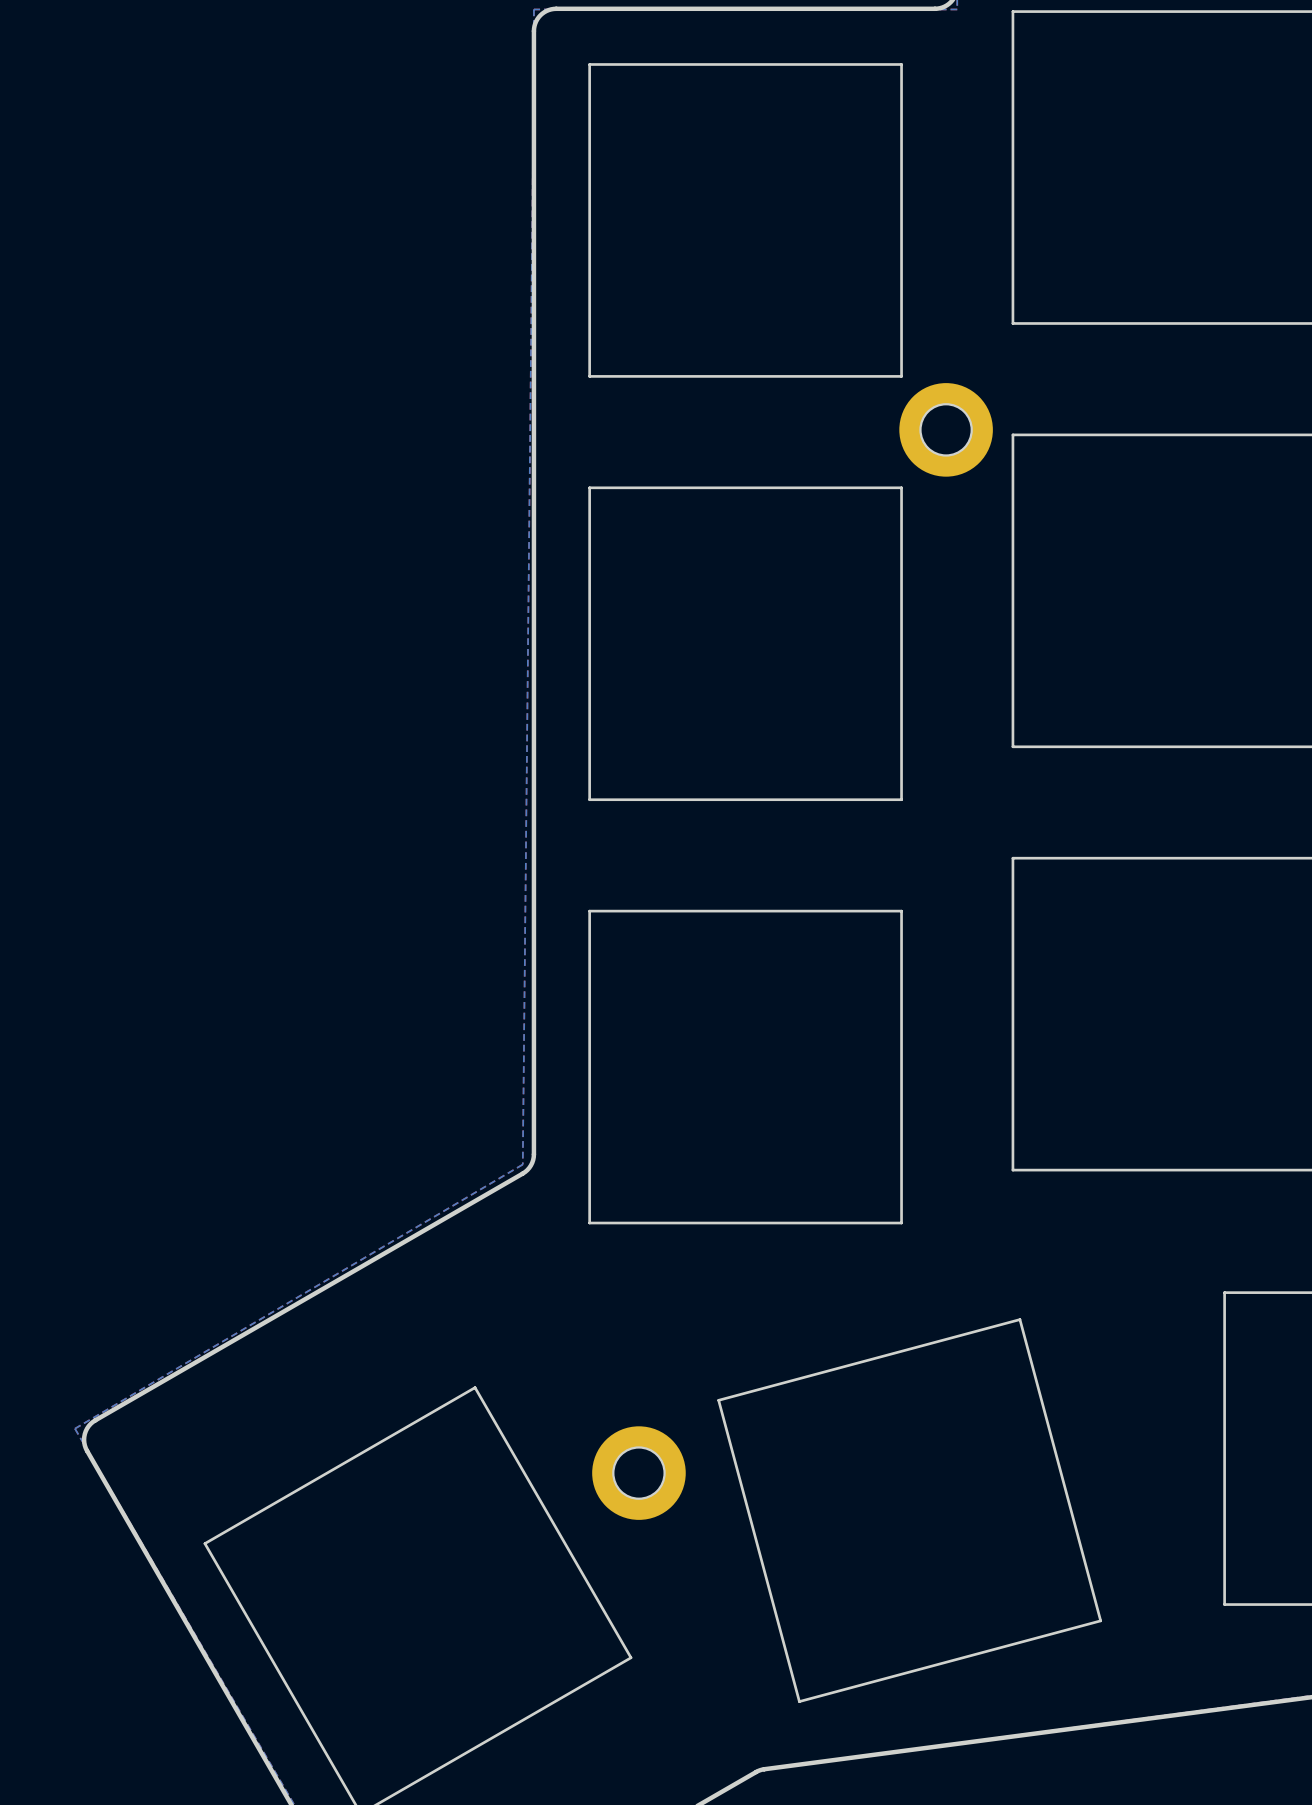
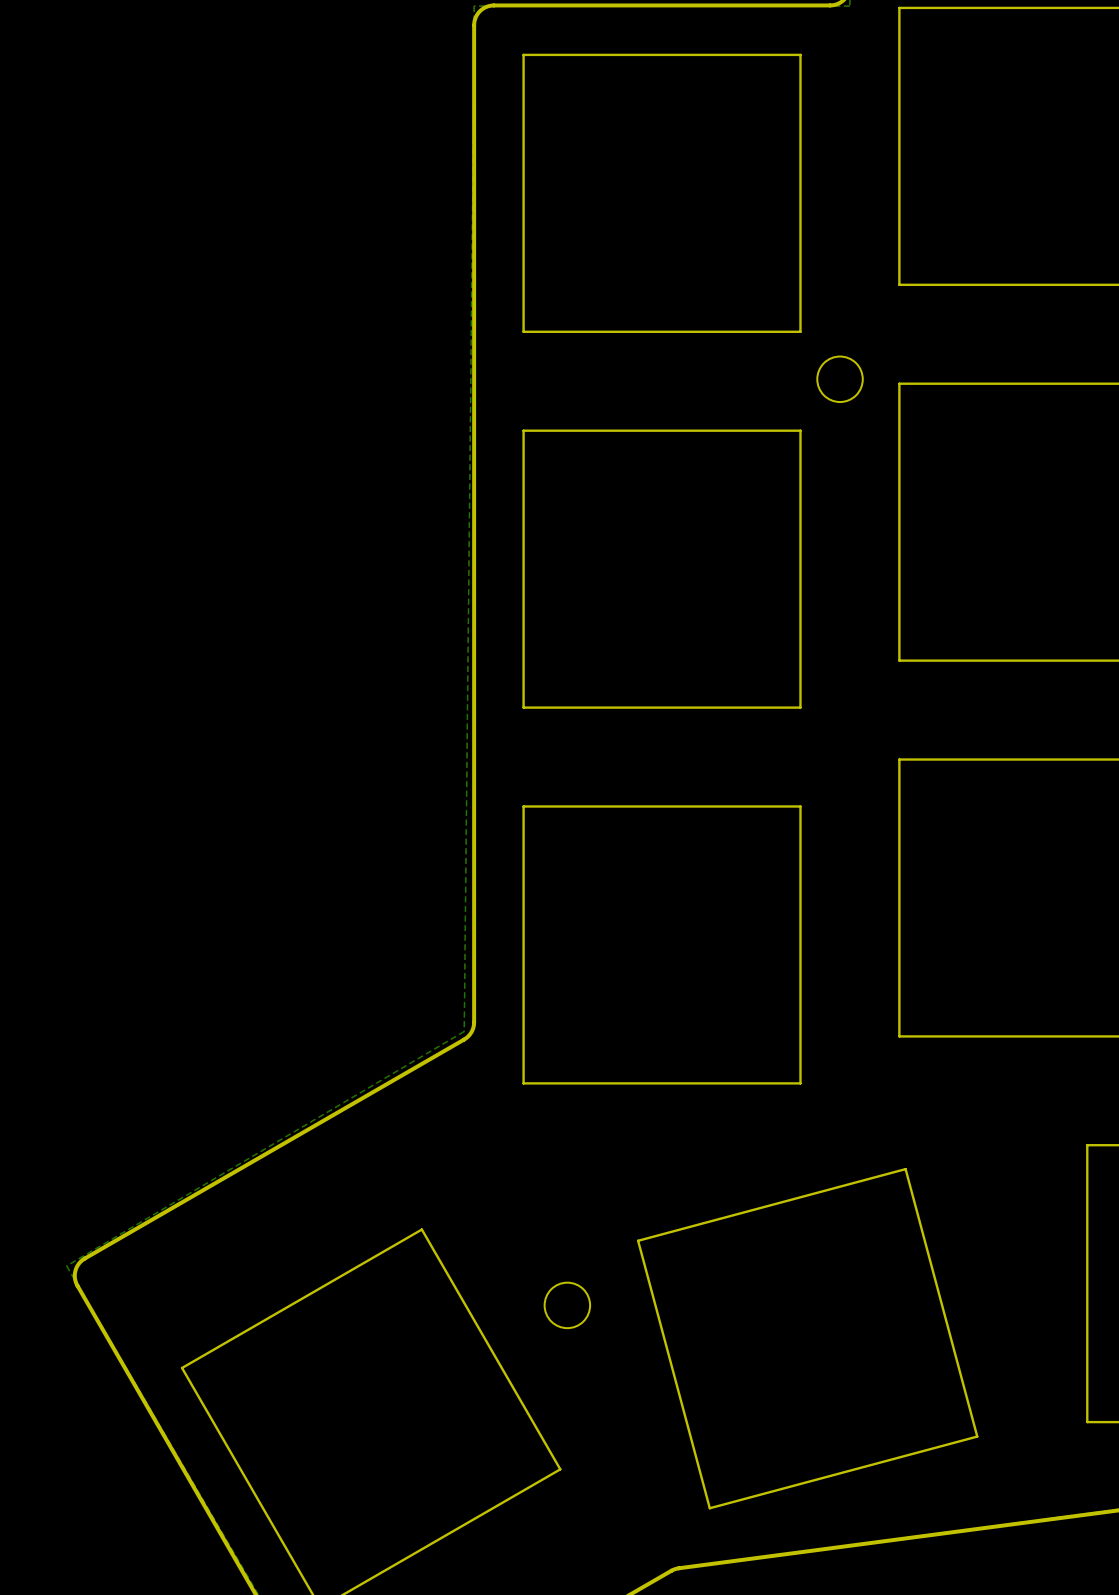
drawing: none -> [816, 355, 864, 404]
part: (946, 429) -> none
drawing: none -> [543, 1281, 592, 1330]
part: (638, 1473) -> none

